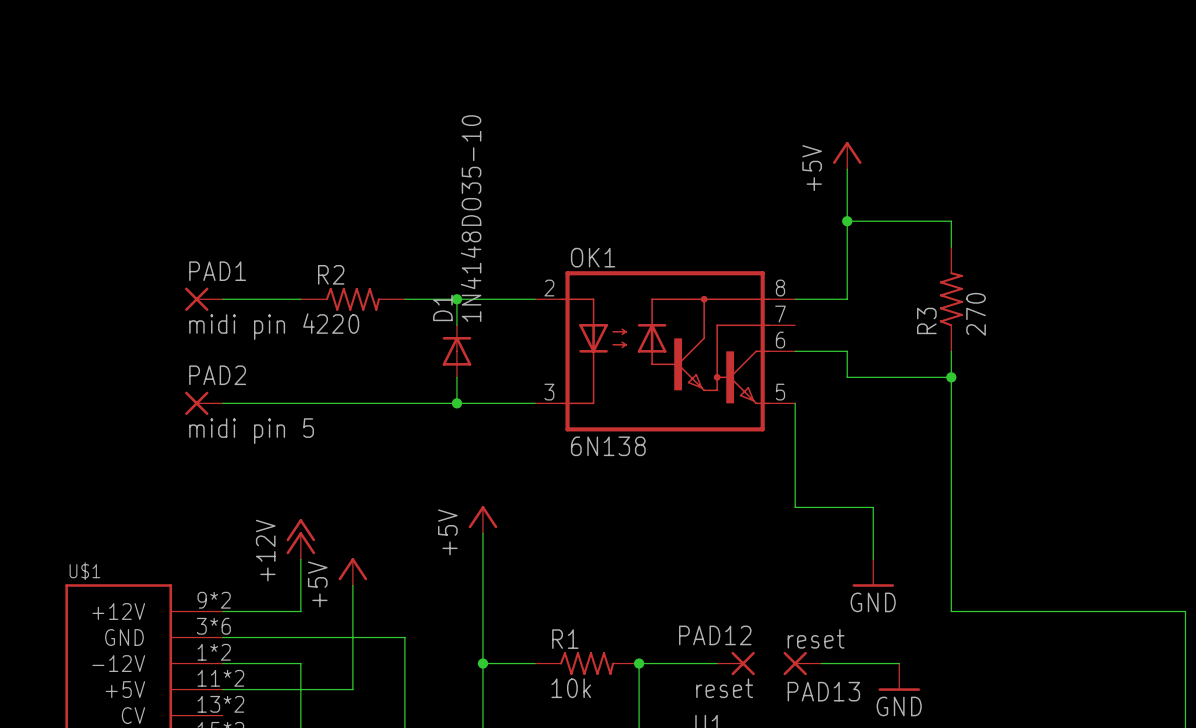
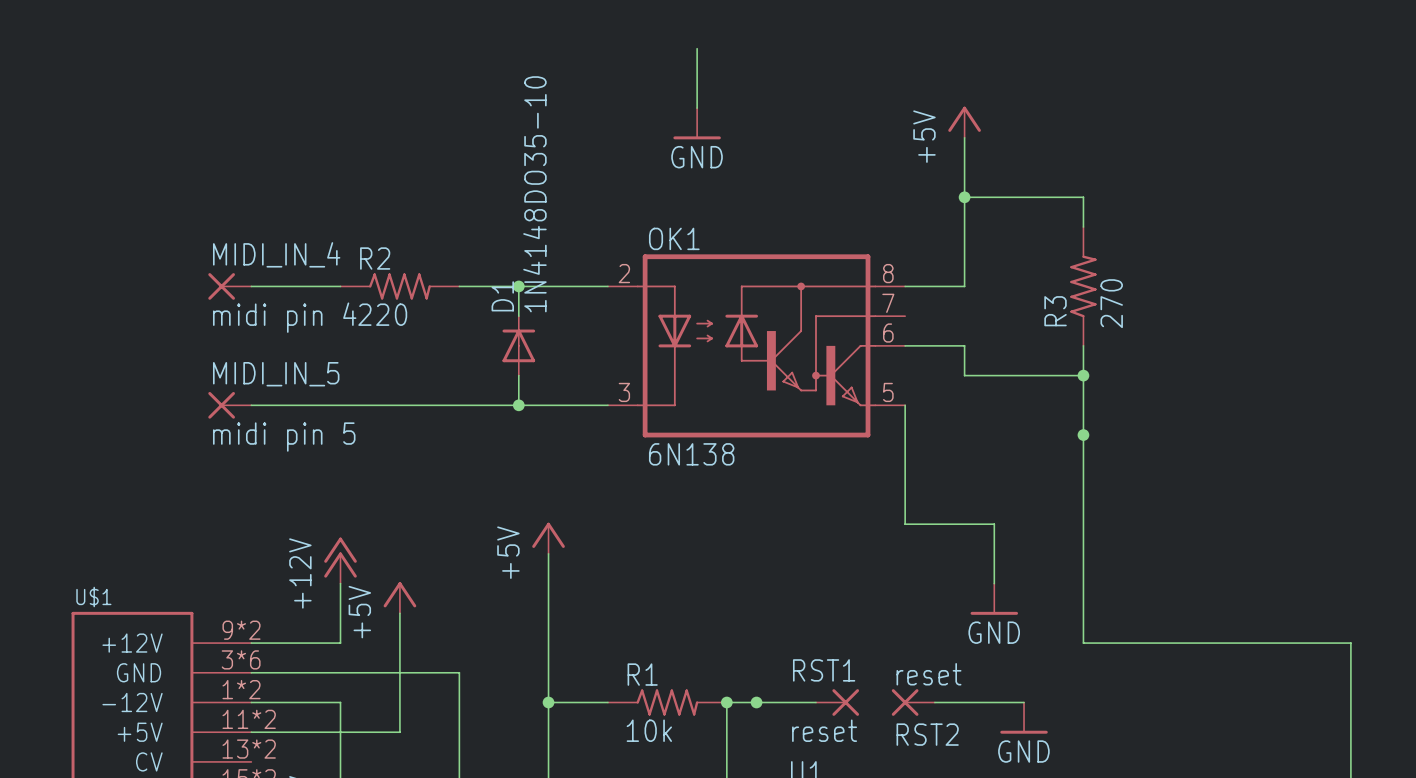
wire: none -> (697, 48) (697, 108)
power symbol: none -> GND (697, 123)
PAD1 name: PAD1 (217, 271) -> MIDI_IN_4 (276, 254)
PAD2 name: PAD2 (217, 375) -> MIDI_IN_5 (276, 374)
junction: none -> (1083, 435)
PAD12 name: PAD12 (715, 635) -> RST1 (824, 670)
junction: none -> (756, 702)
PAD13 name: PAD13 (823, 691) -> RST2 (927, 734)

